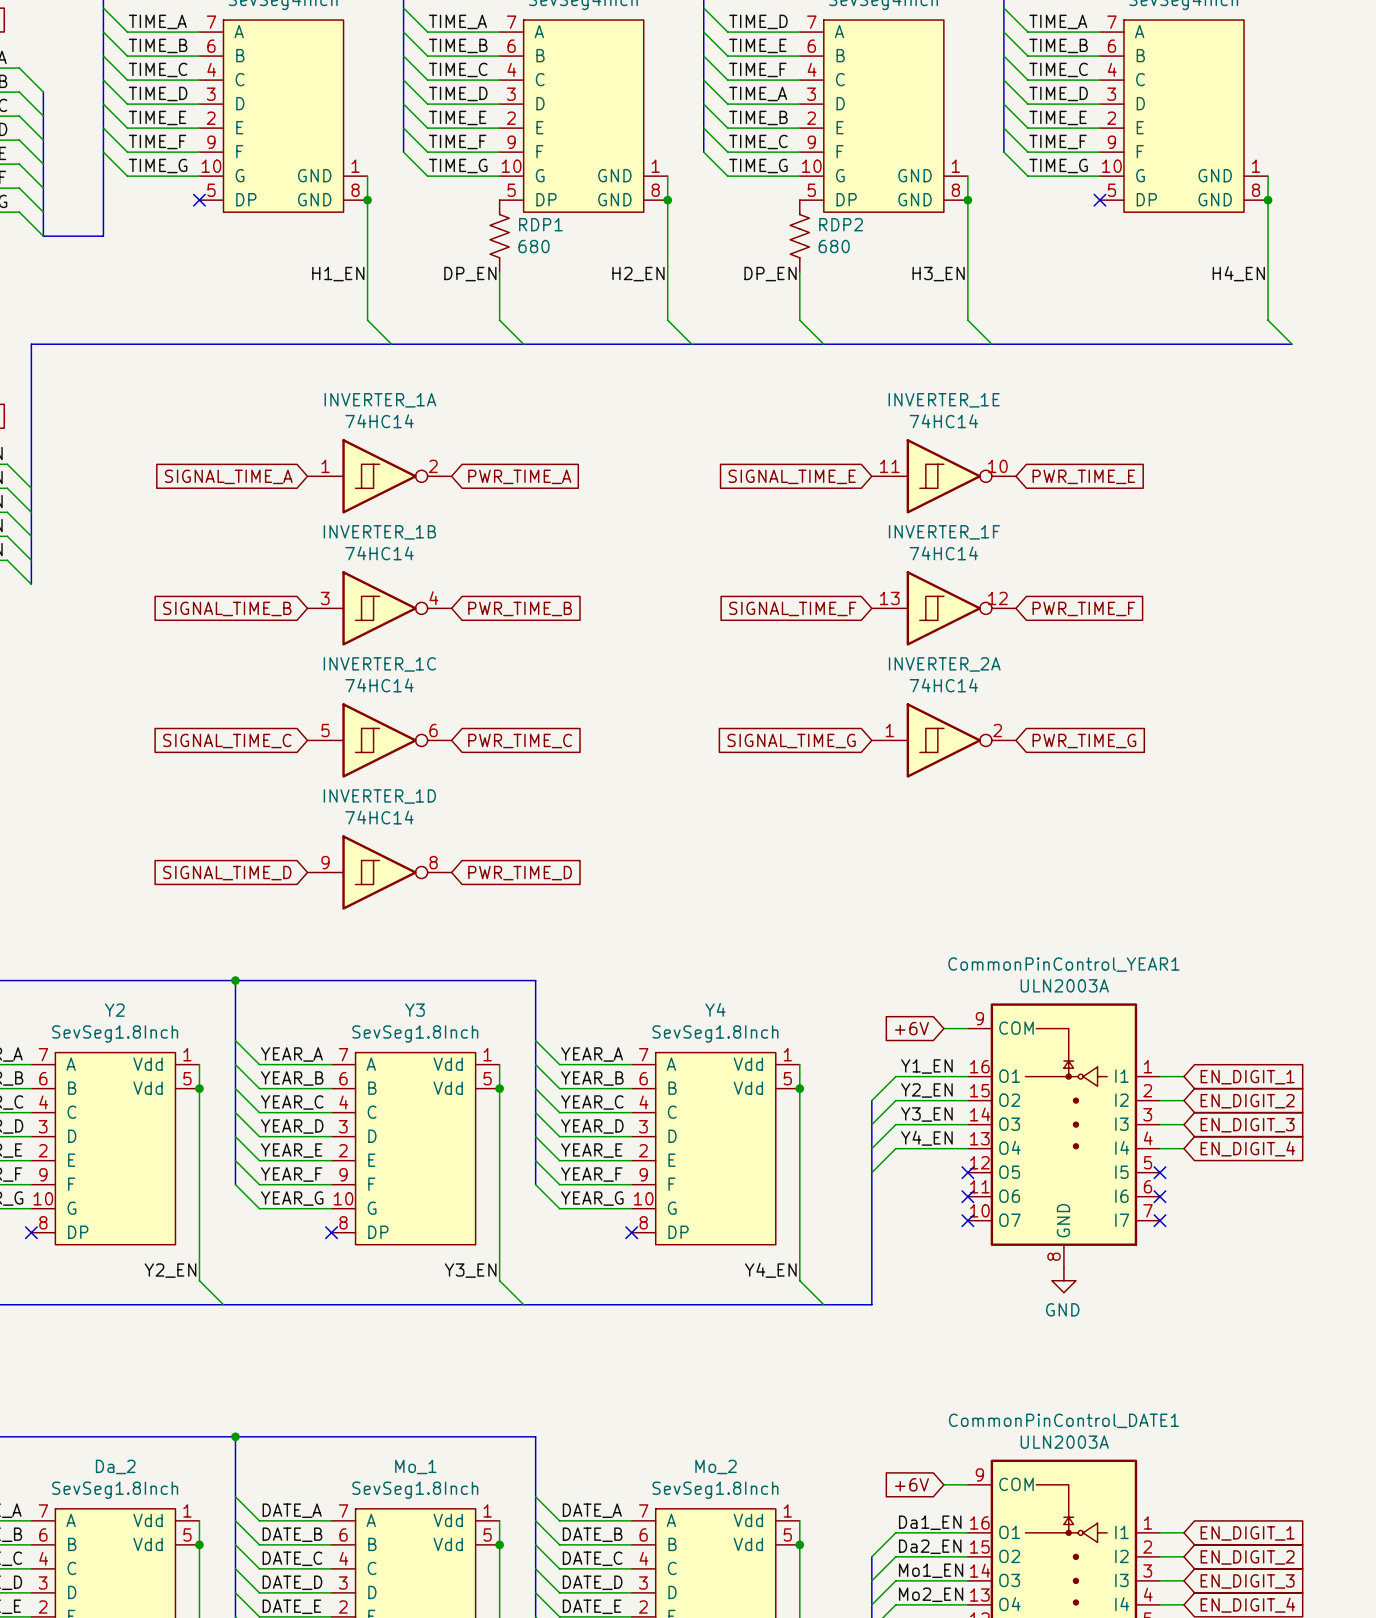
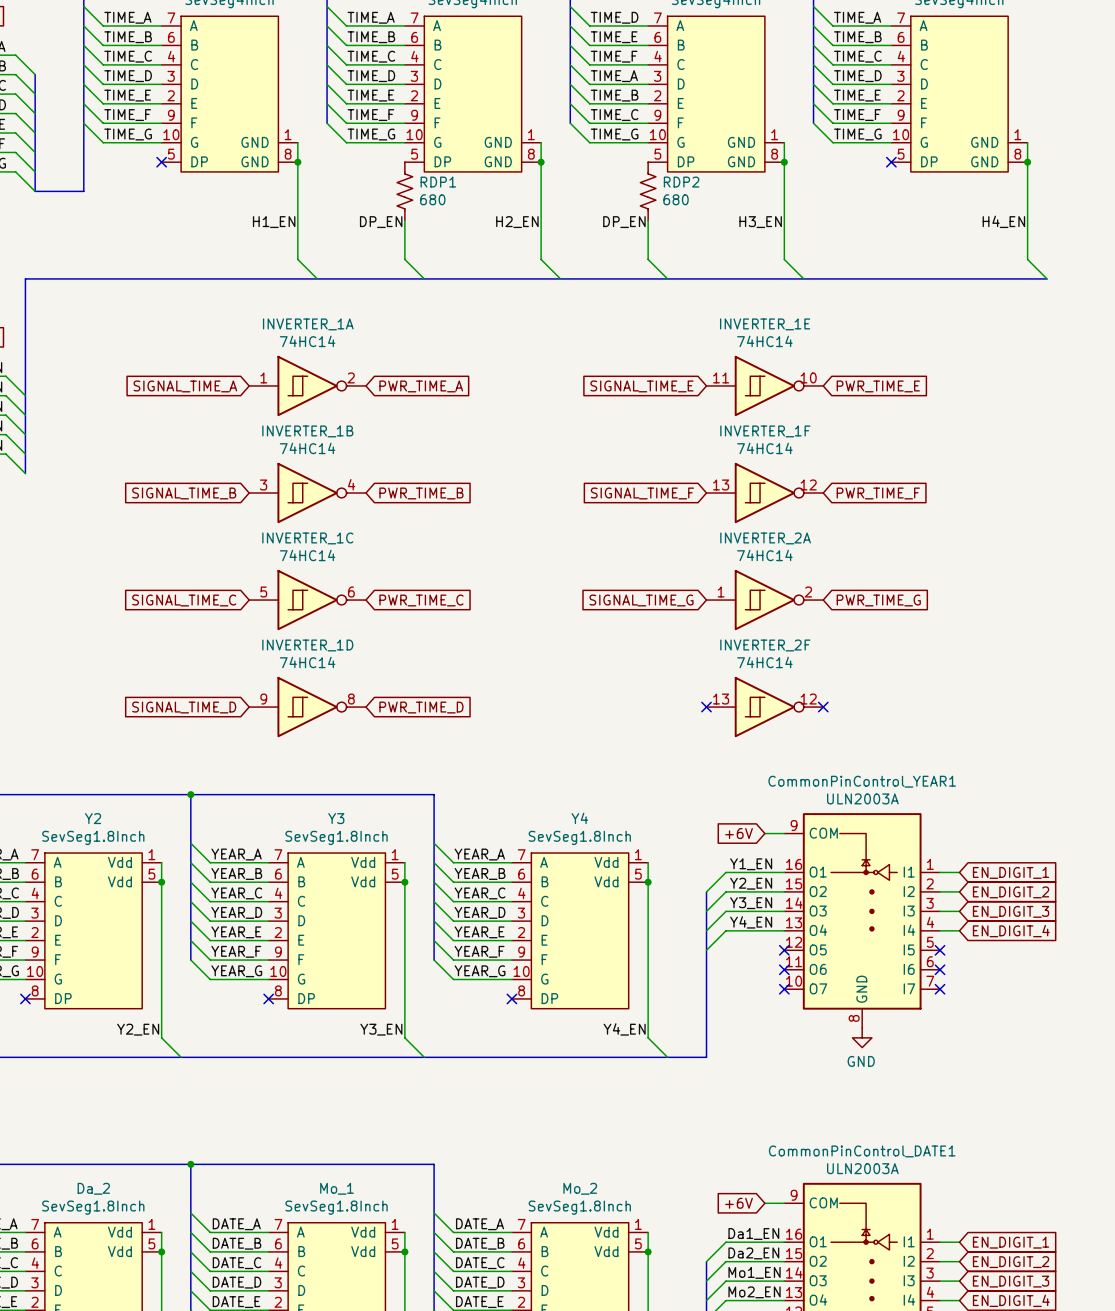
no-connect mark: none -> (706, 707)
INVERTER_2F: none -> 74HC14 (764, 707)
no-connect mark: none -> (823, 707)

